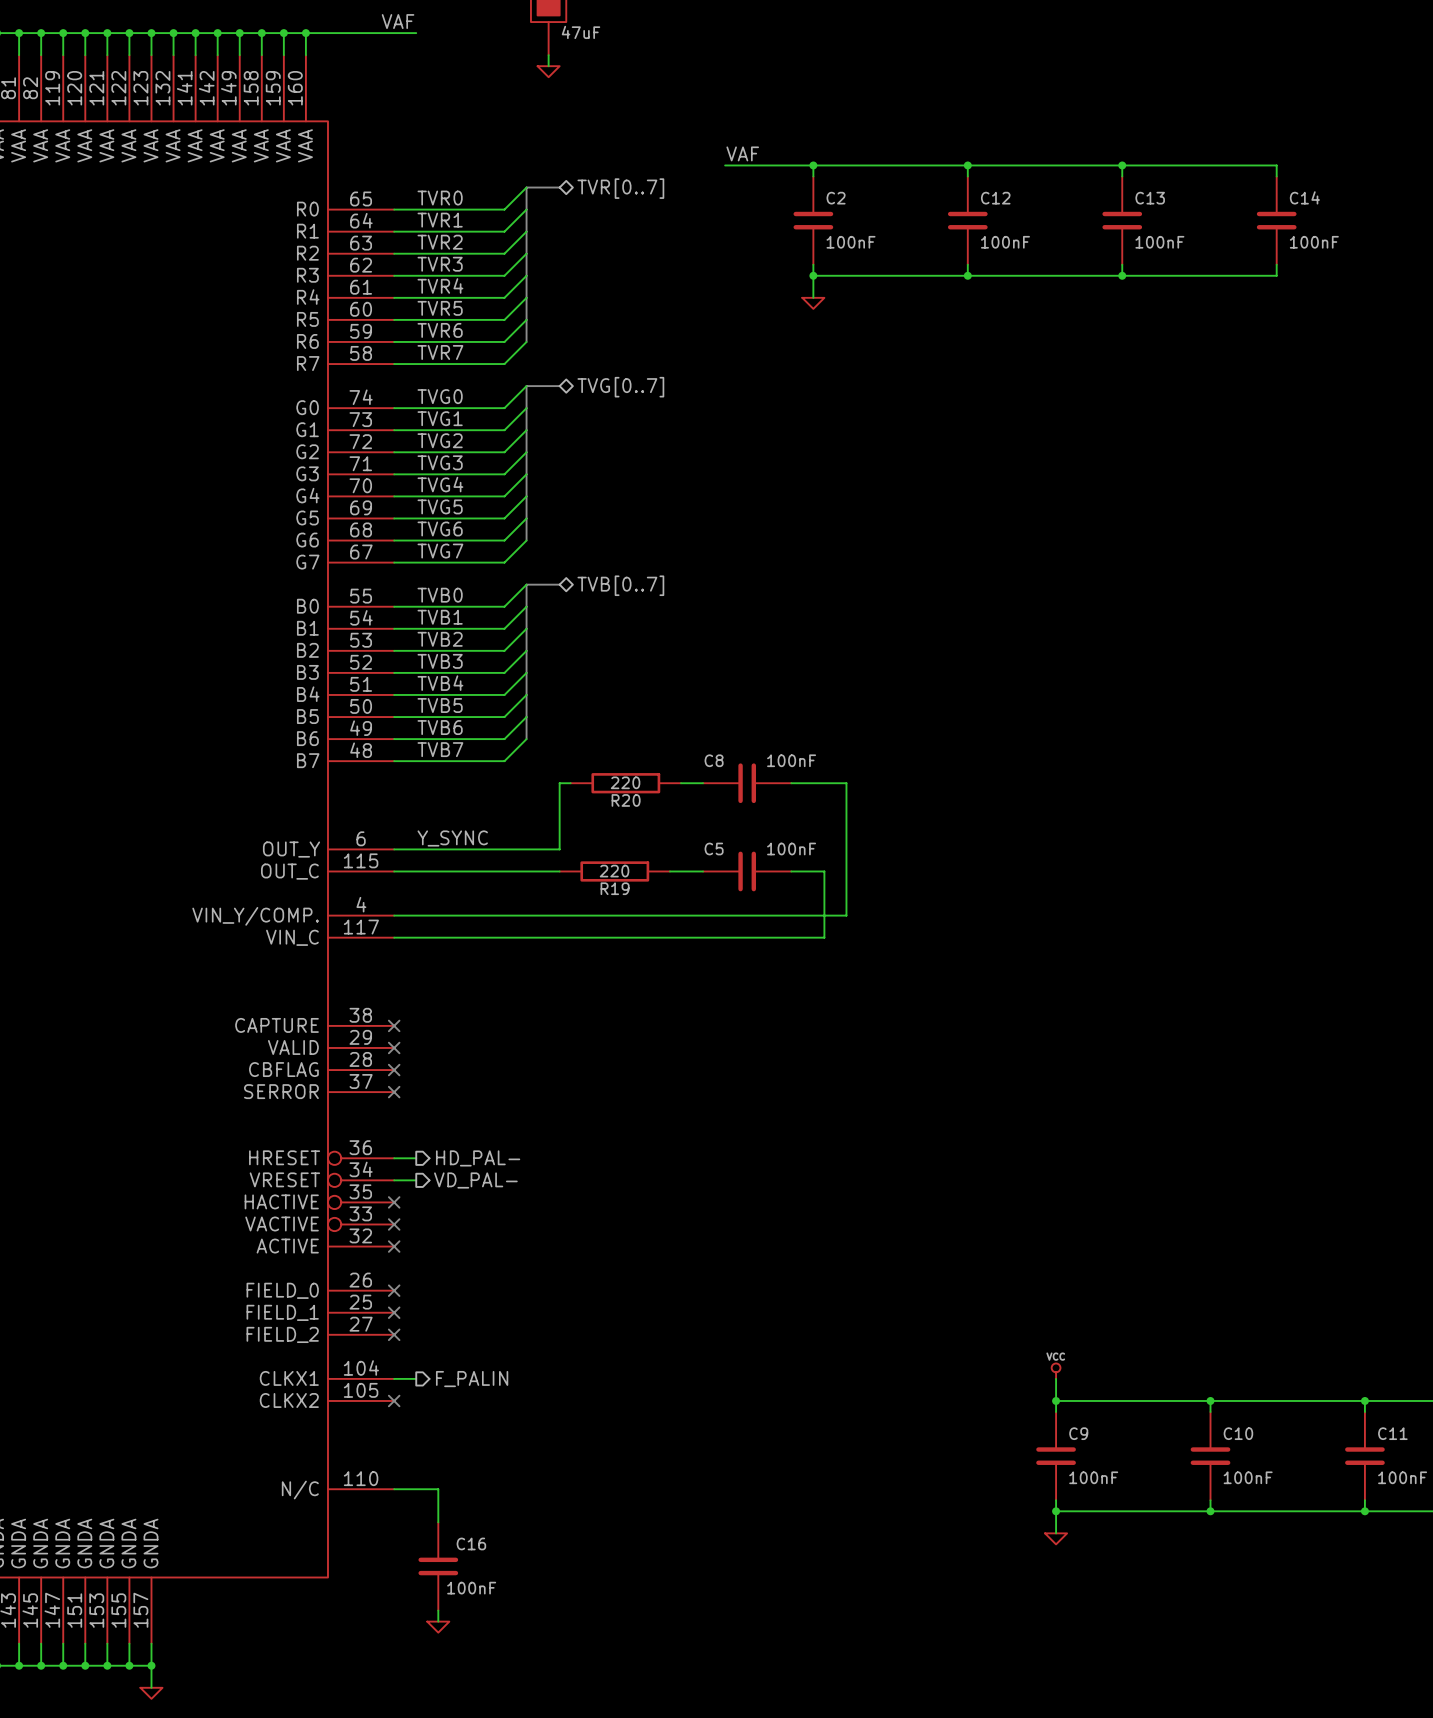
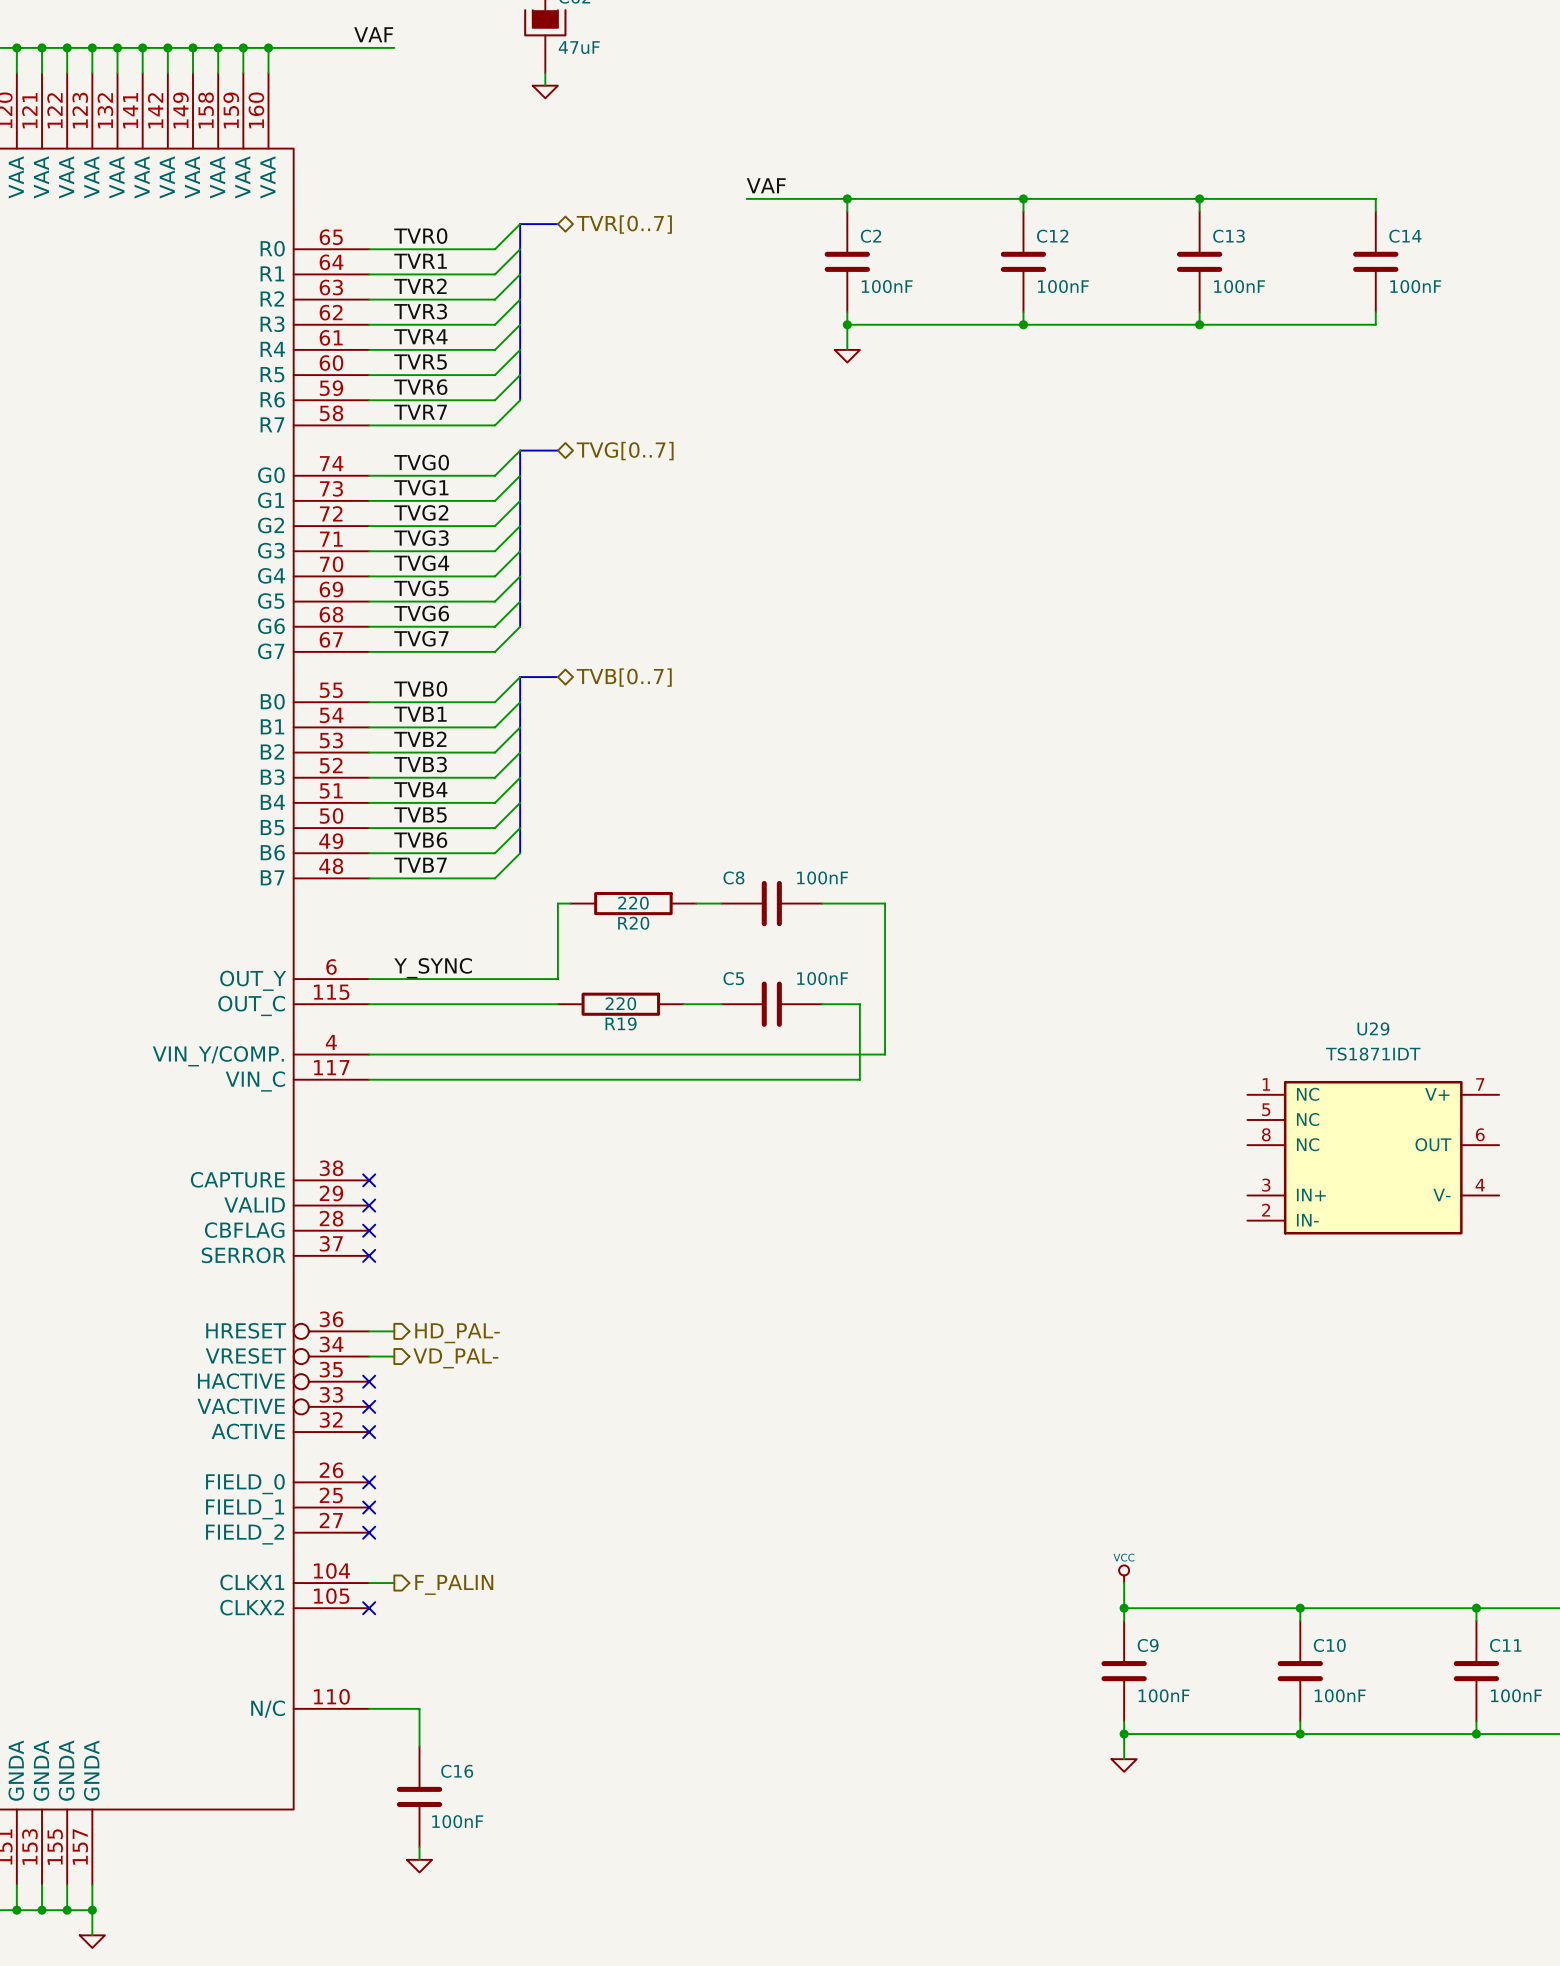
U29: none -> TS1871IDT (1373, 1157)

